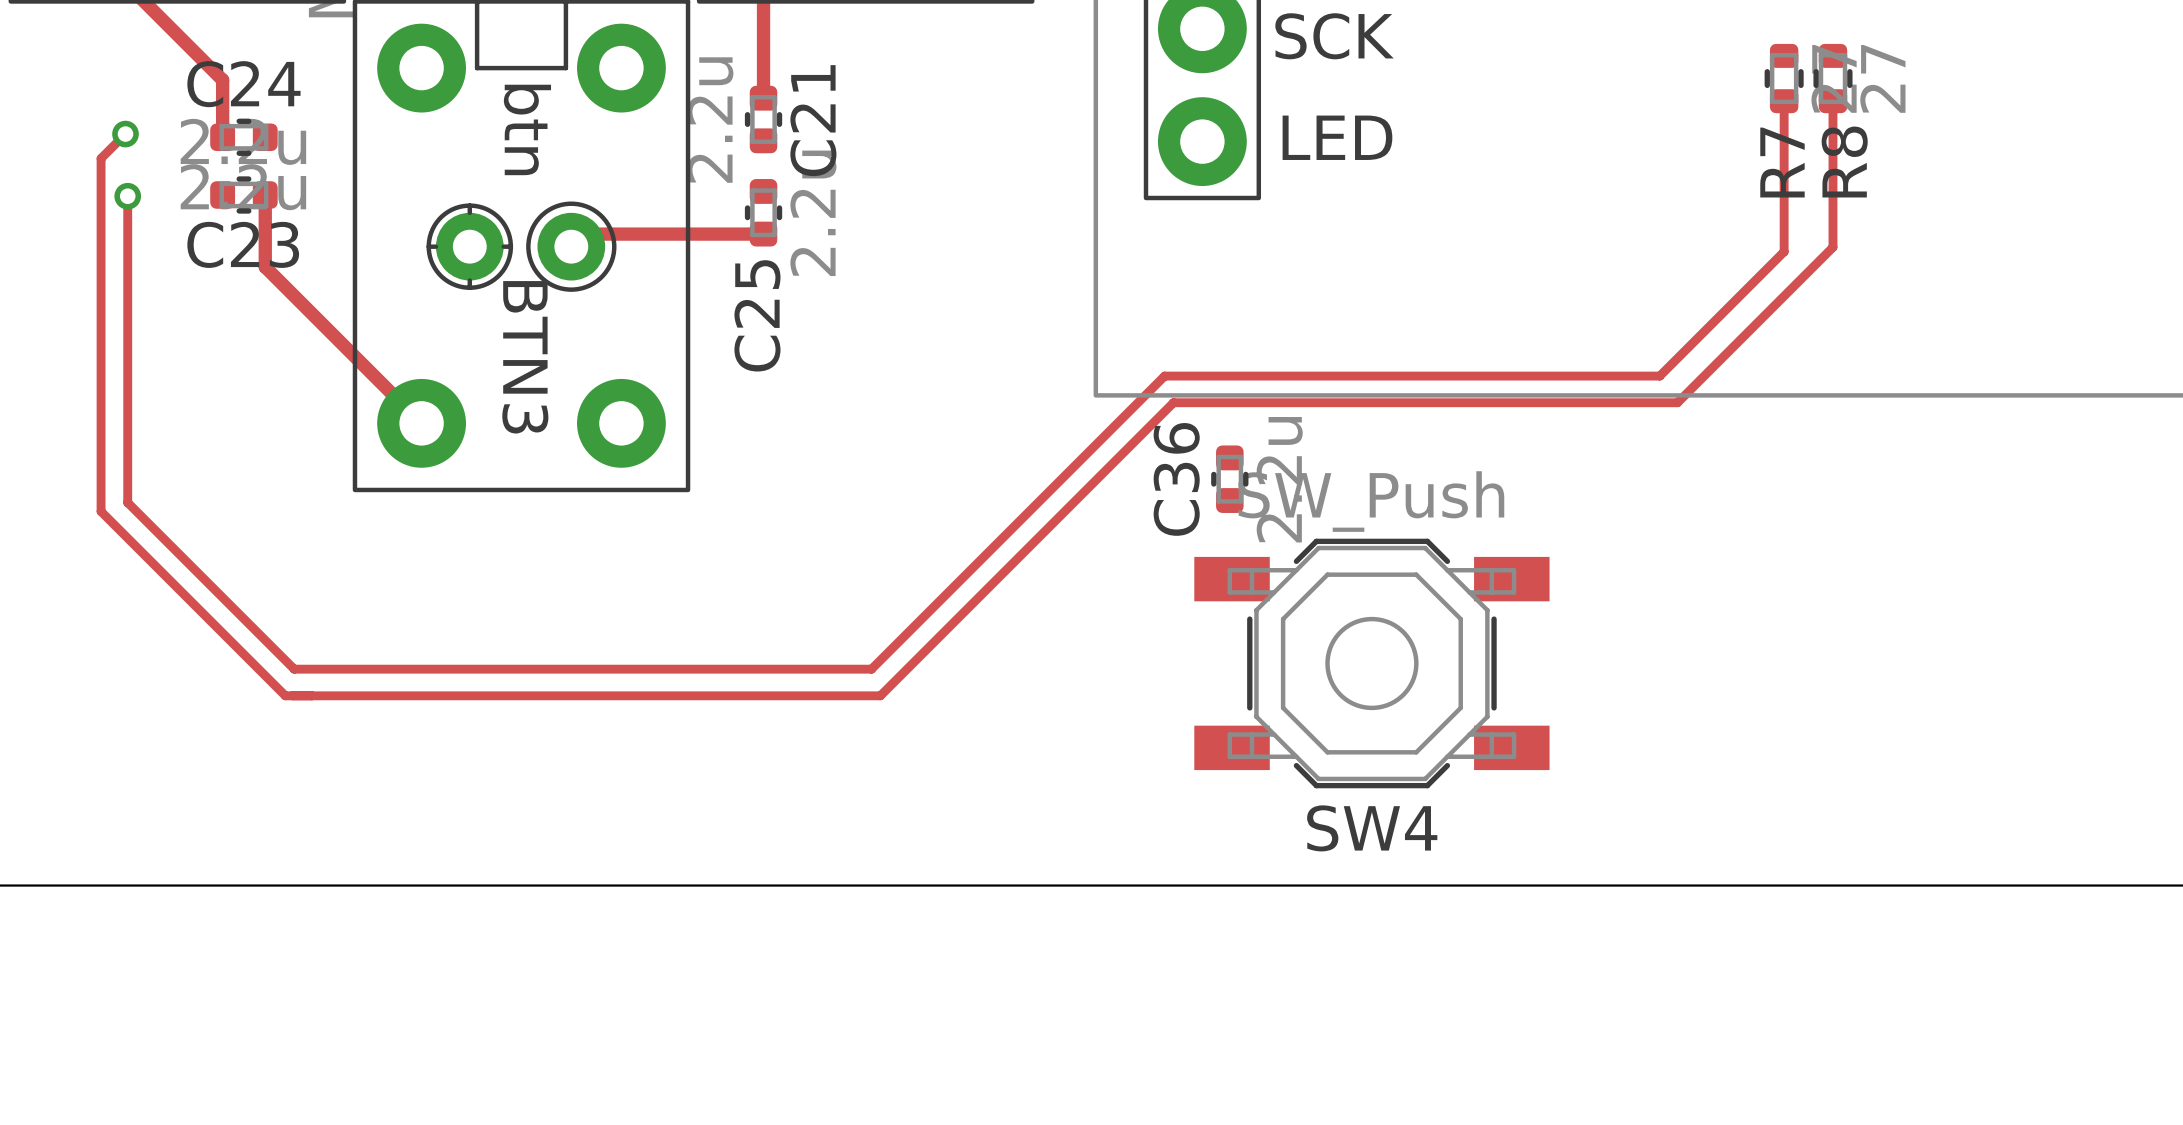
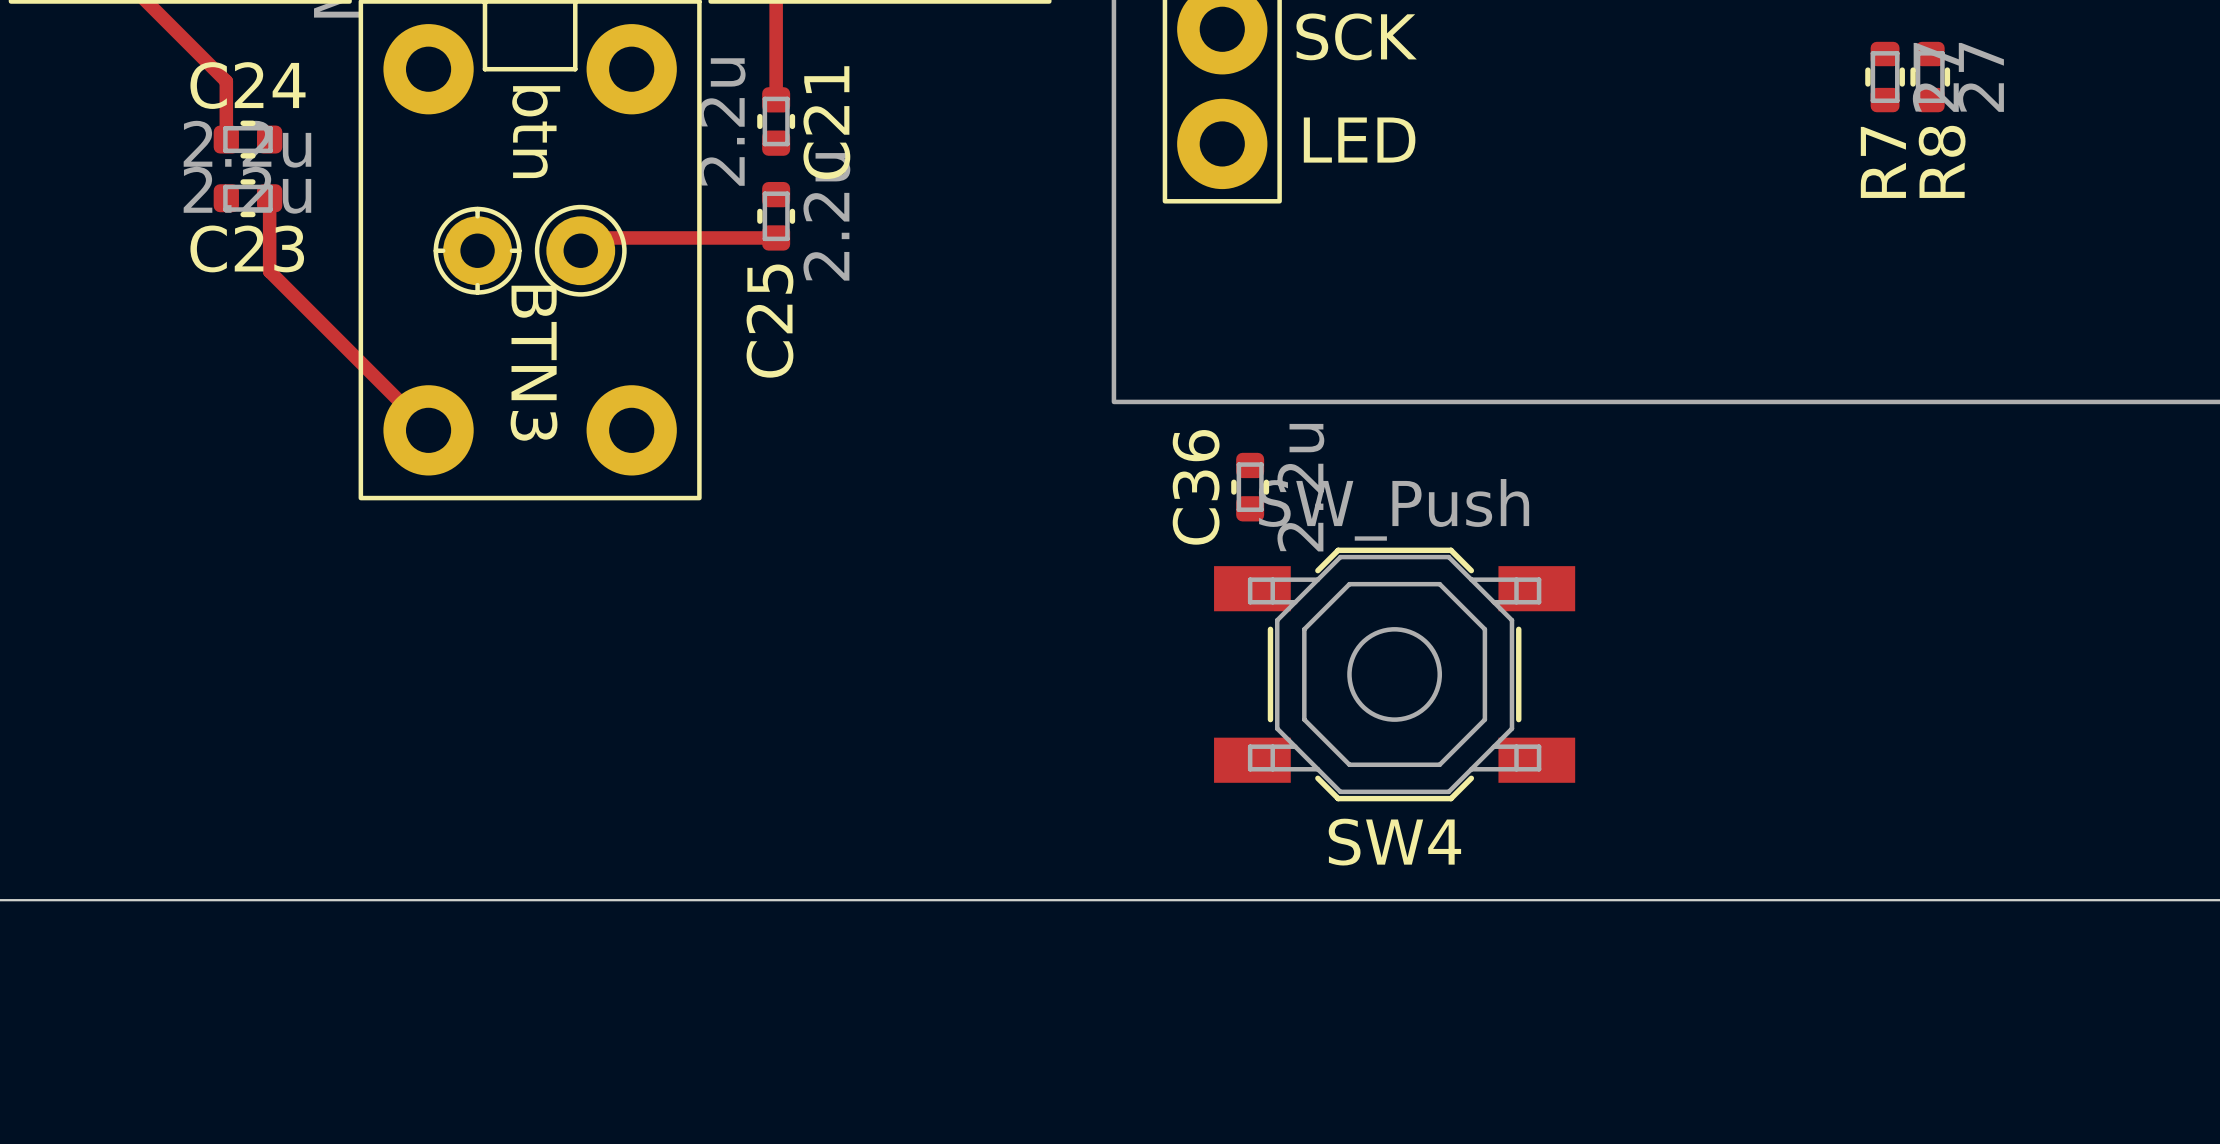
R7 position: (1784, 78) -> (1885, 77)
R8 position: (1832, 78) -> (1930, 77)
track: (1784, 101) (1784, 251) (1659, 376) (1164, 376) (871, 669) (294, 669) (127, 502) (127, 196) -> none
track: (1832, 101) (1832, 247) (1677, 402) (1173, 402) (880, 695) (285, 695) (101, 511) (101, 158) (125, 134) -> none
via: (125, 134) -> none
via: (127, 196) -> none

